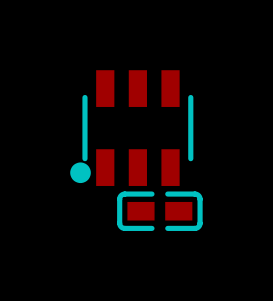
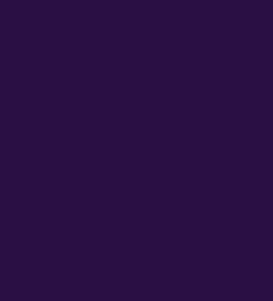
part: (131, 128) -> none
part: (159, 211) -> none

